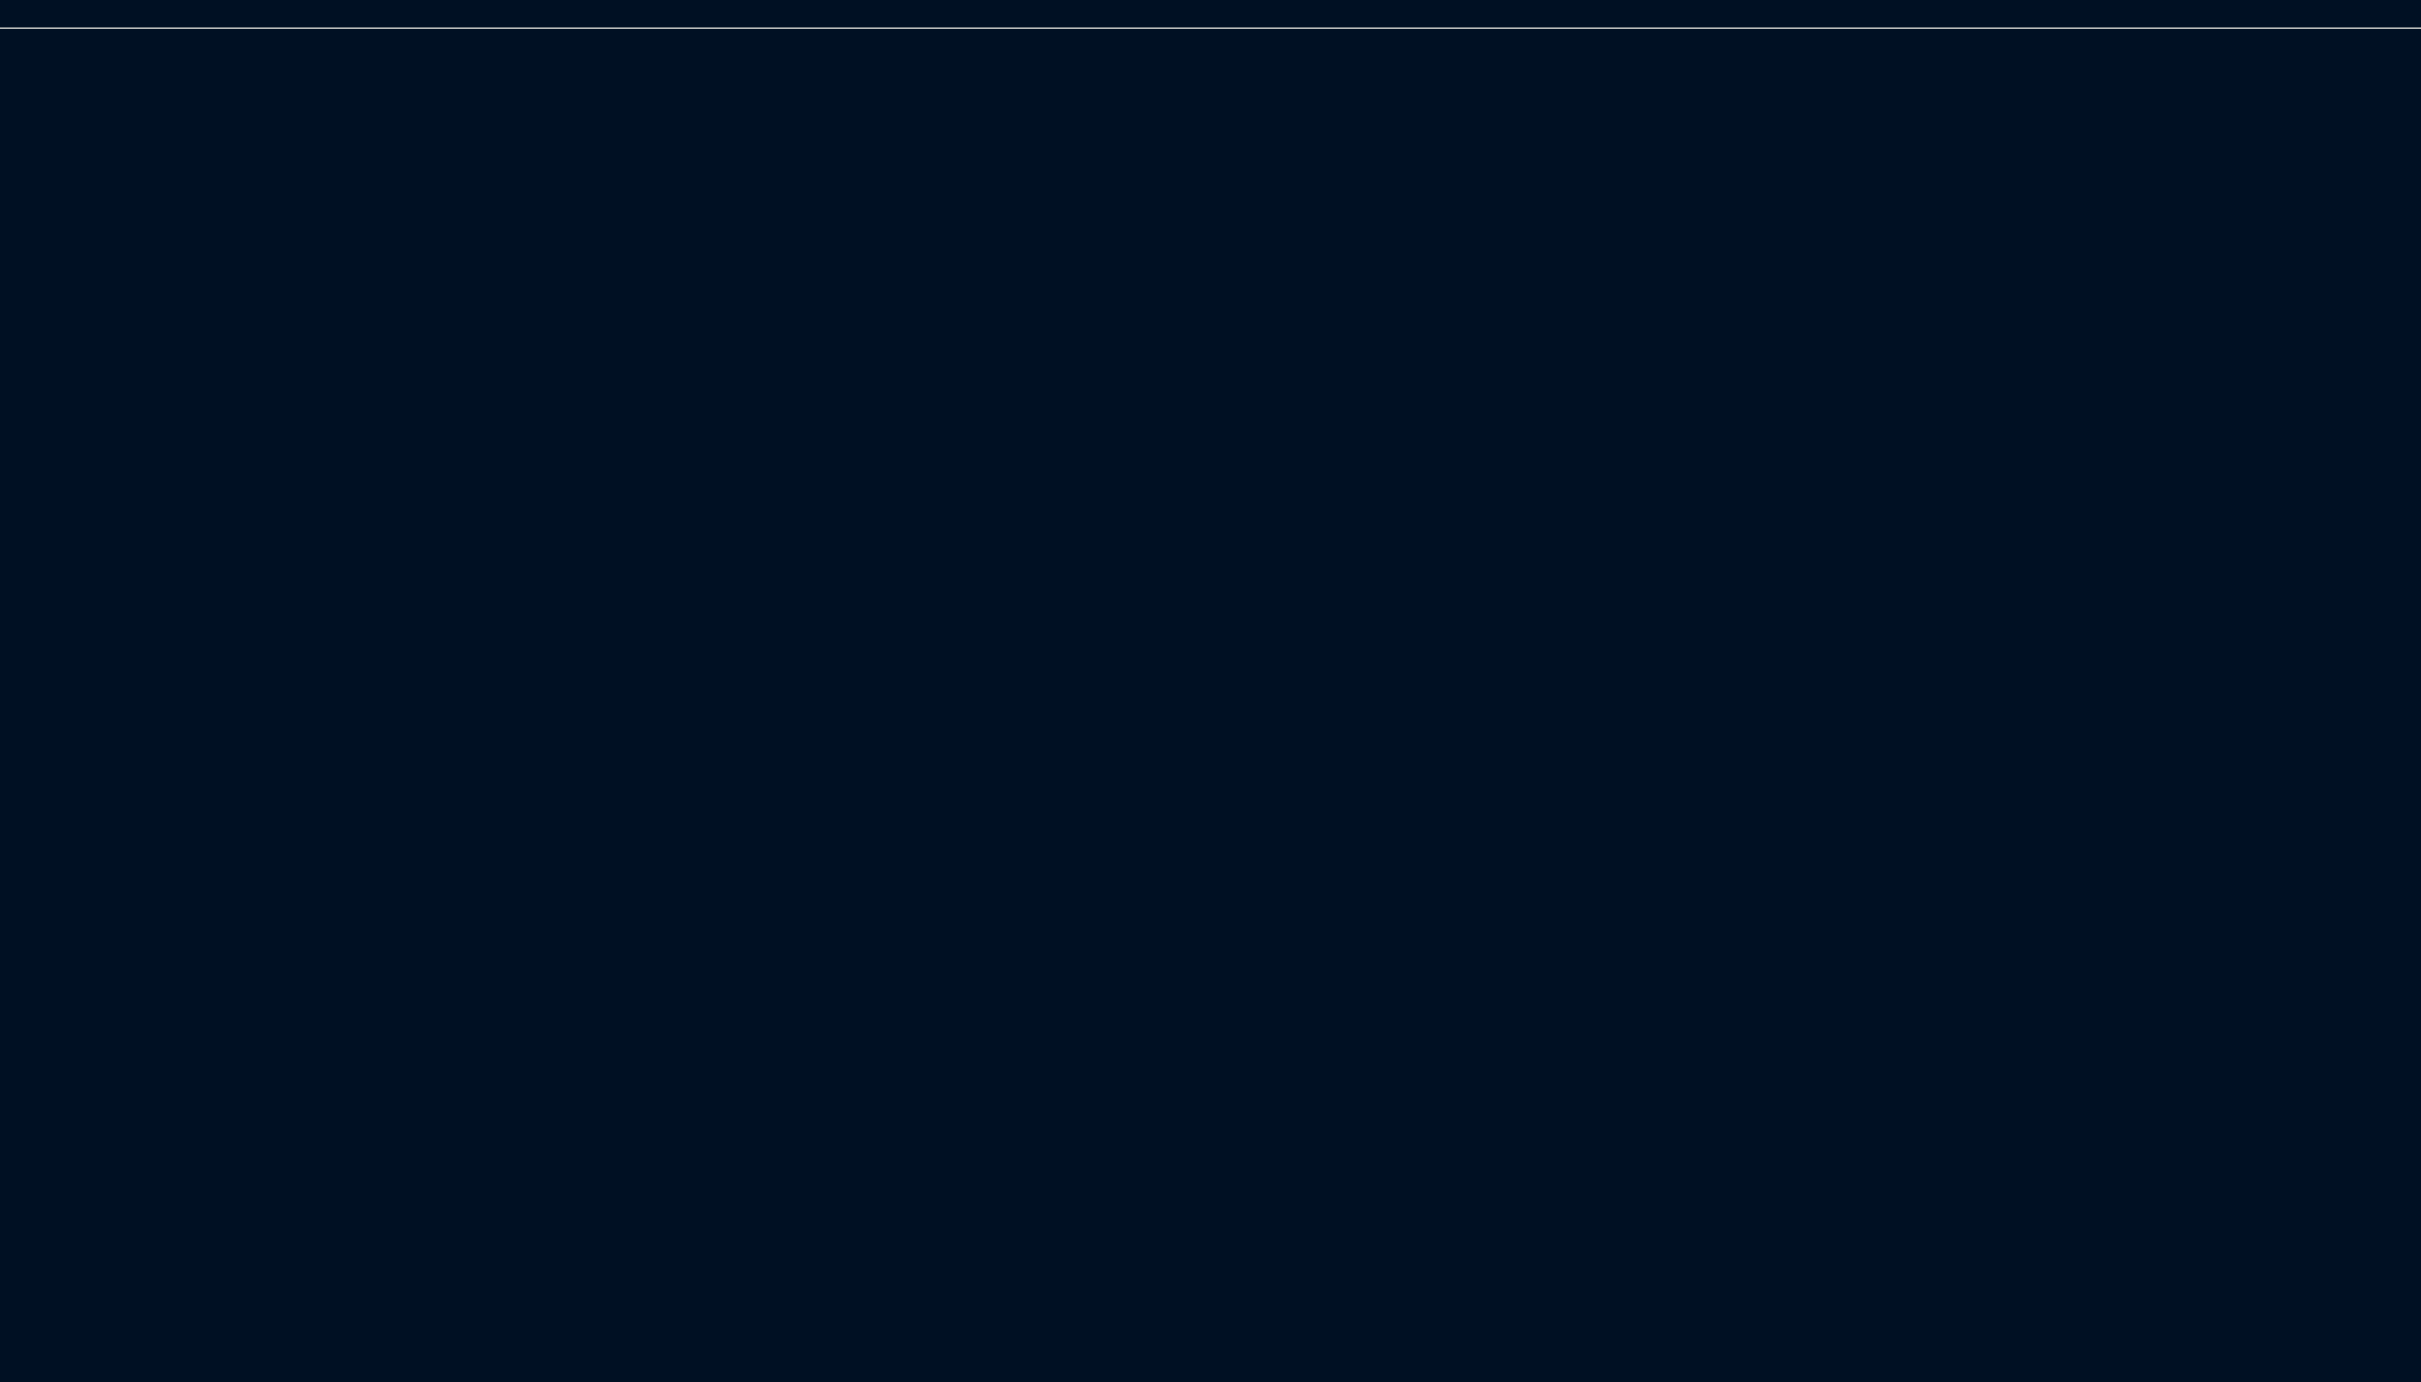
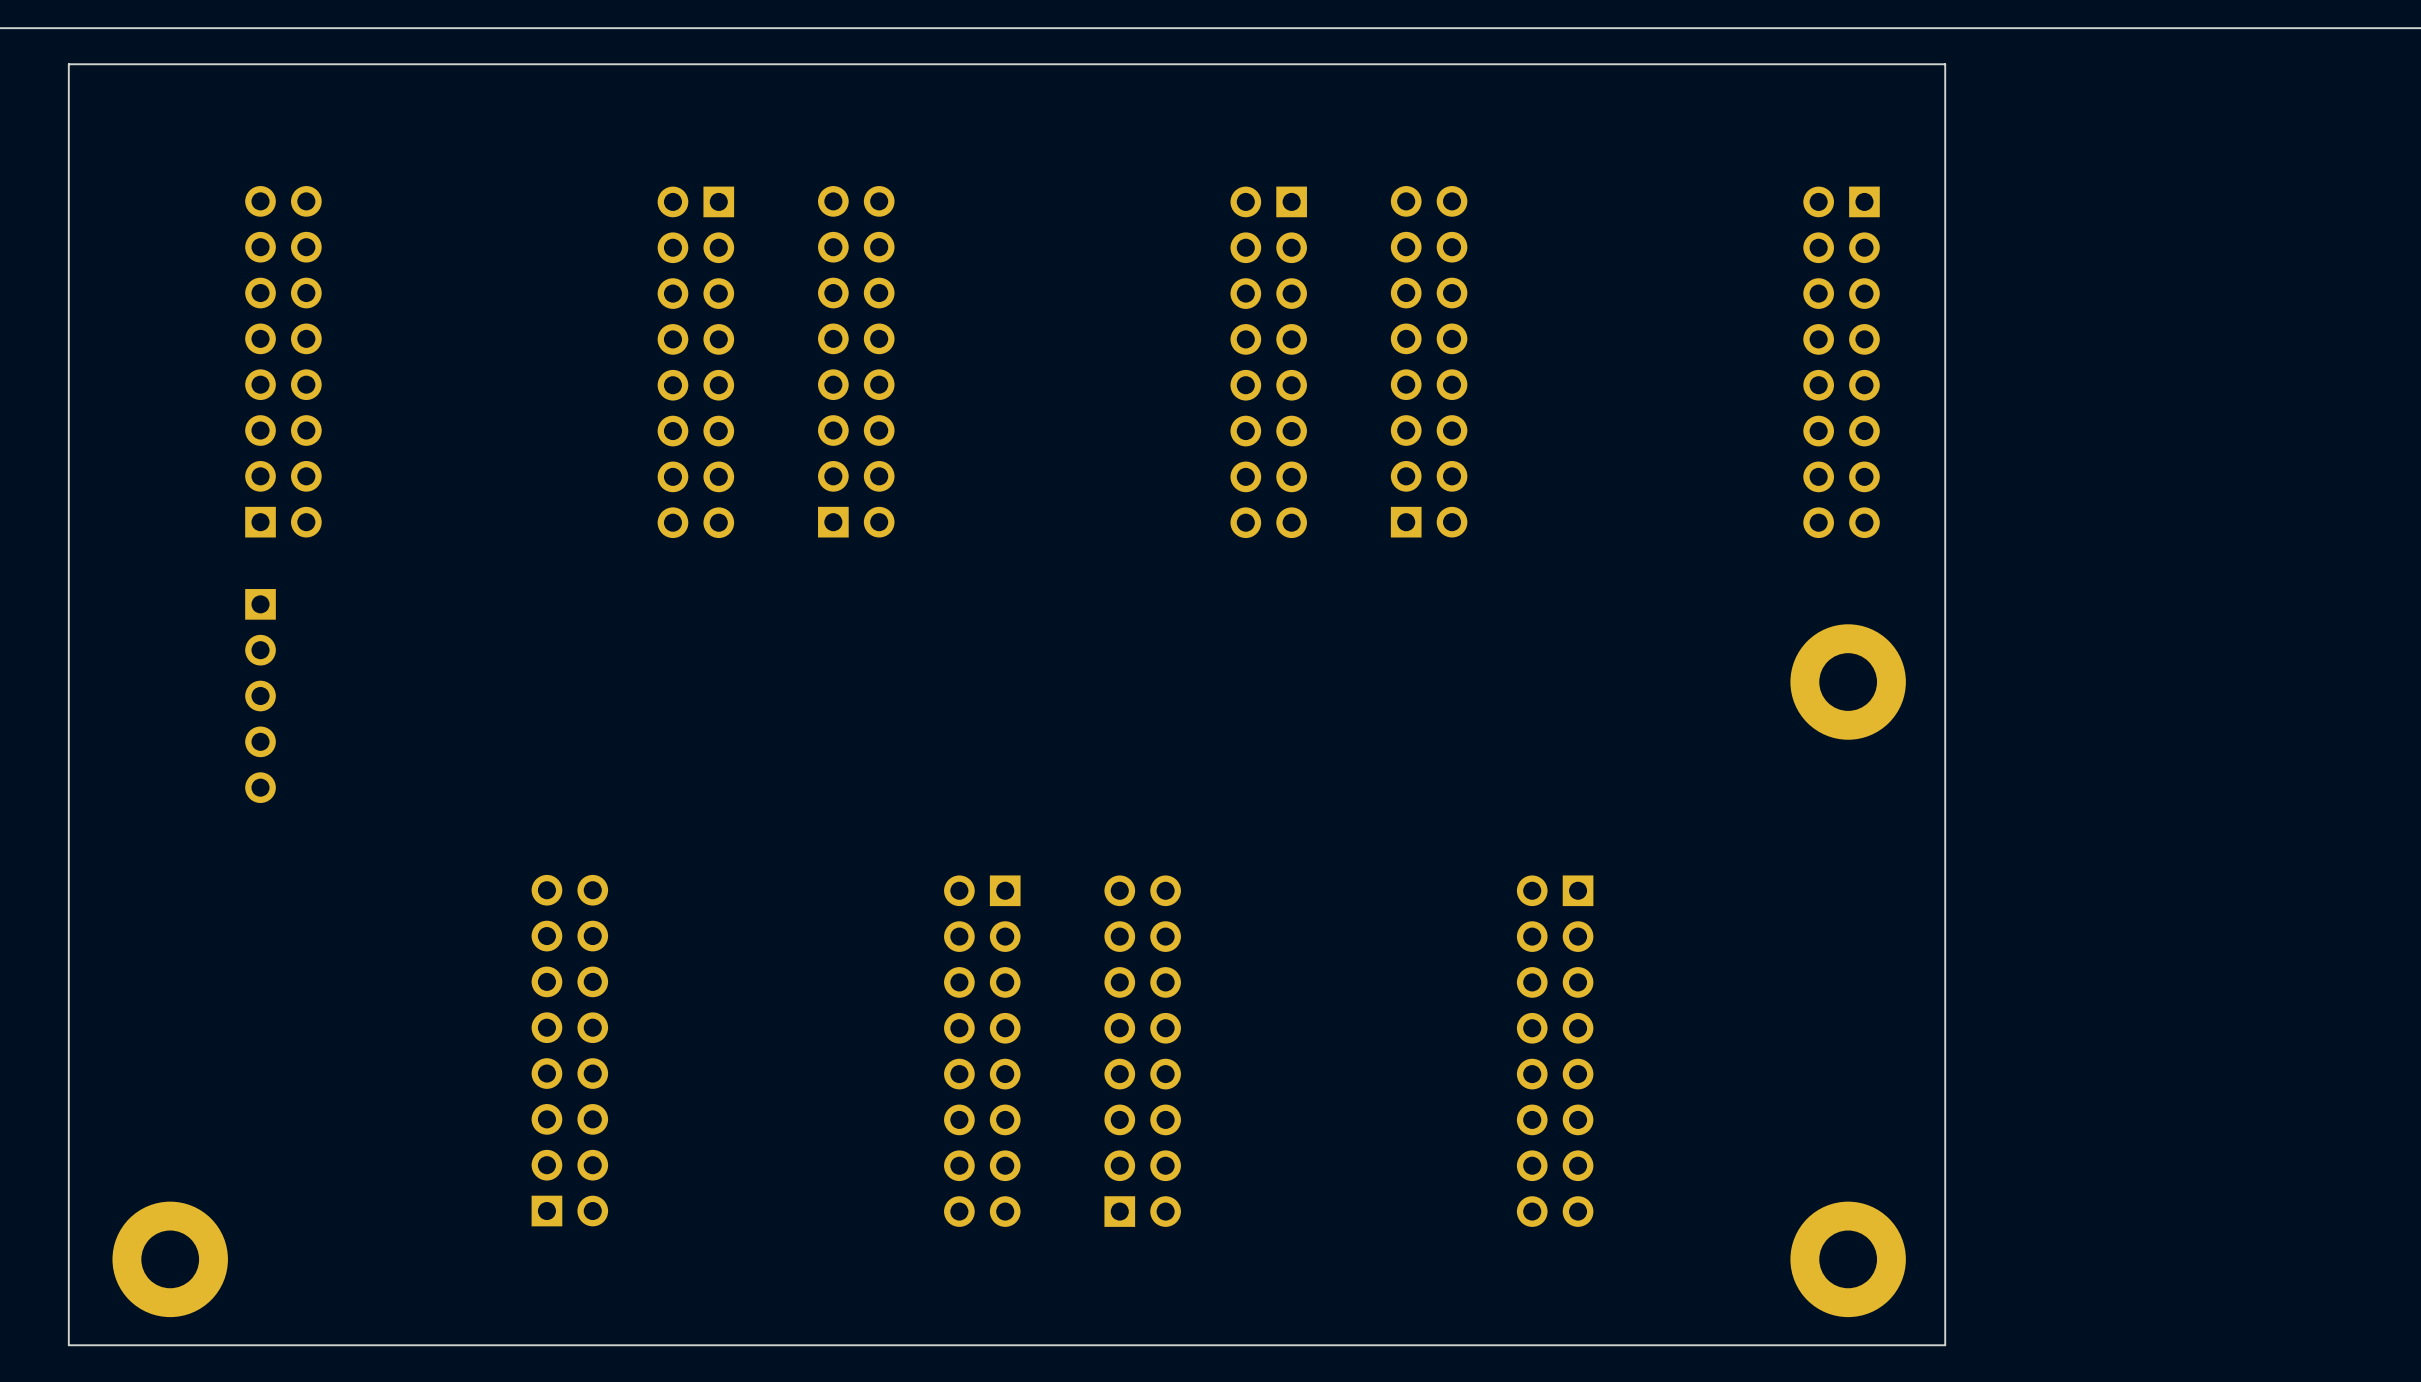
board edge: none -> (1945, 64) (68, 64) (68, 1345) (1945, 1345) (1945, 64)
part: none -> (283, 361)
part: none -> (856, 361)
part: none -> (1429, 361)
part: none -> (695, 362)
part: none -> (1268, 362)
part: none -> (1841, 362)
part: none -> (1848, 682)
part: none -> (260, 696)
part: none -> (569, 1050)
part: none -> (982, 1051)
part: none -> (1142, 1051)
part: none -> (1555, 1051)
part: none -> (170, 1259)
part: none -> (1848, 1259)

